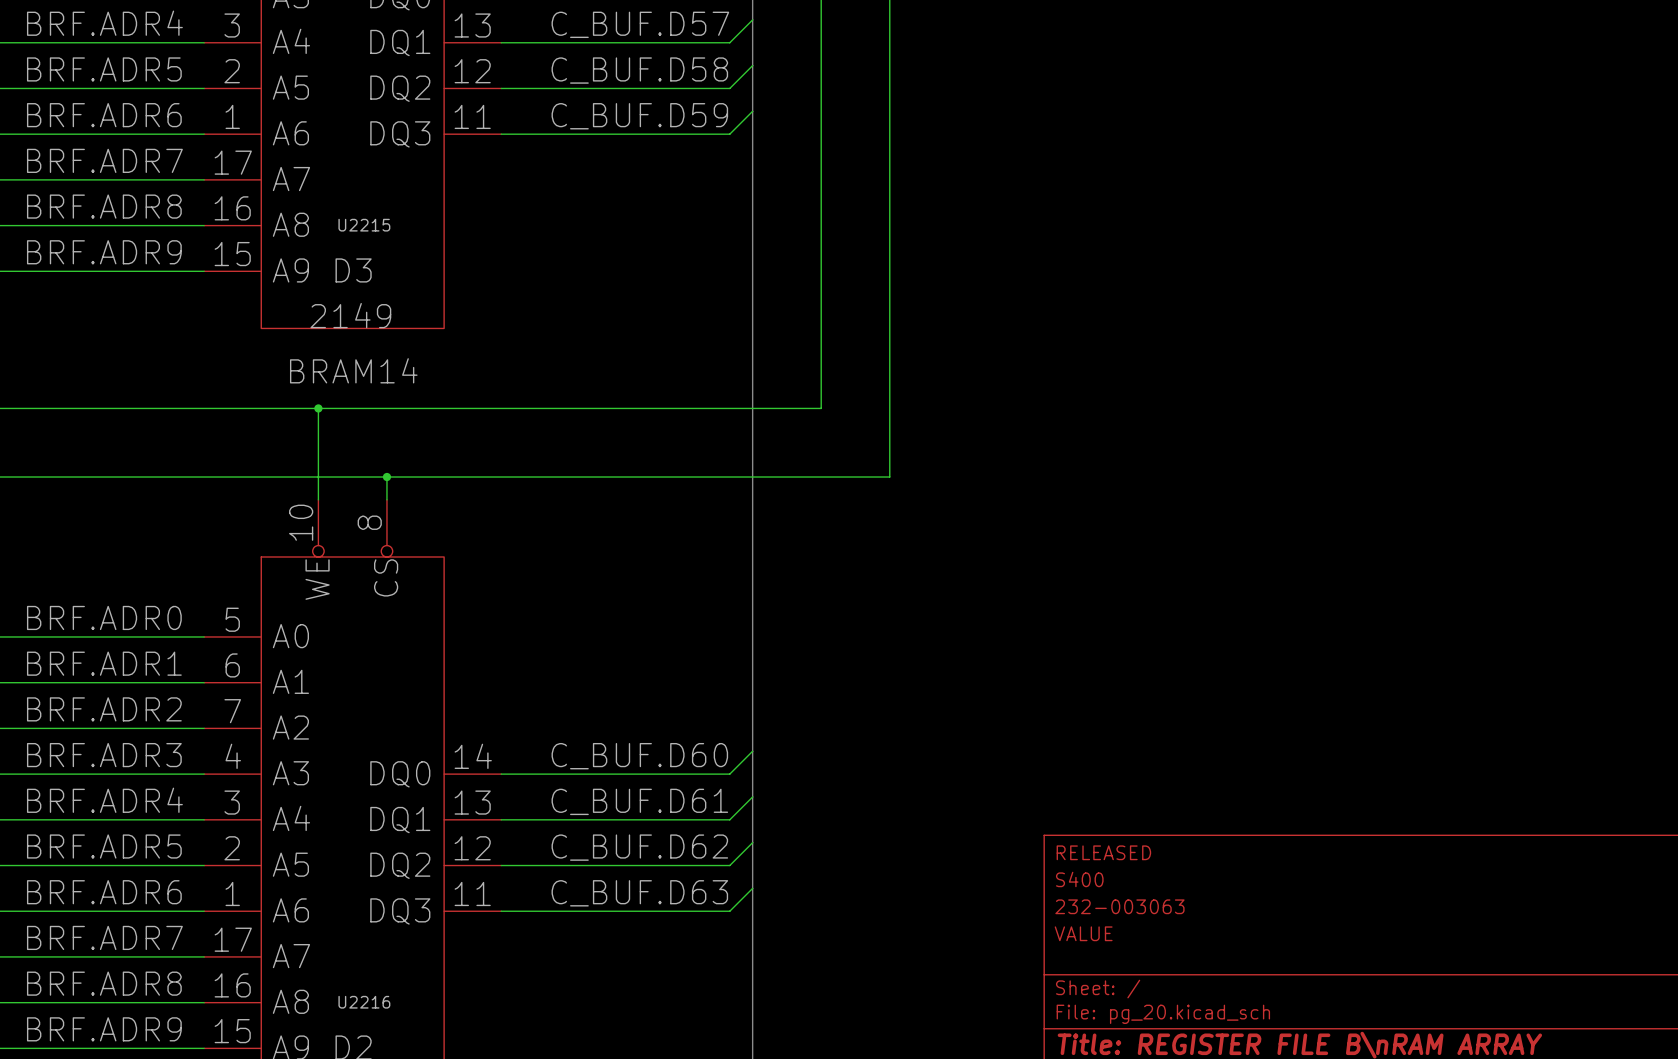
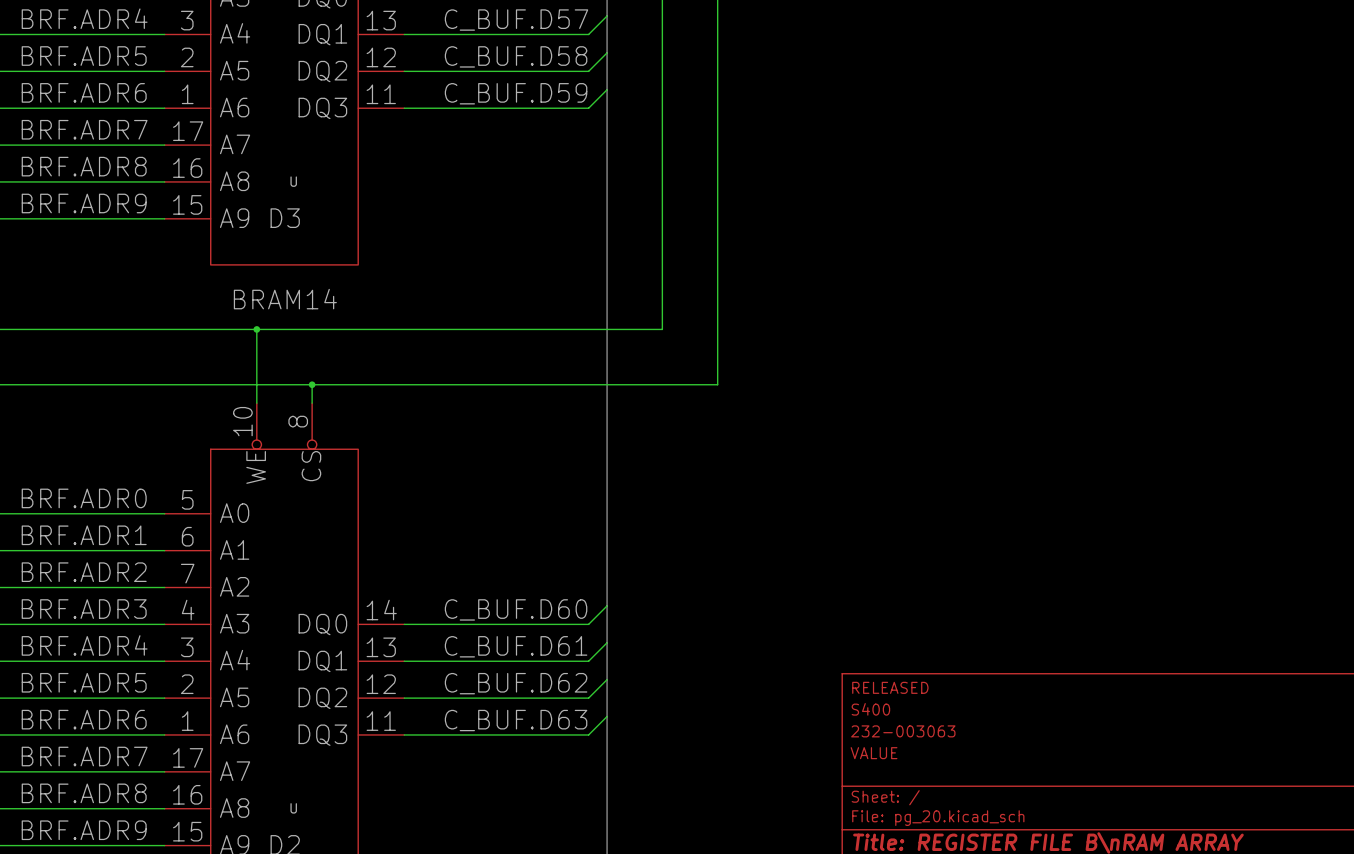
U2215 name: U2215 (364, 225) -> U (293, 181)
U2215 value: 2149 (350, 315) -> none
U2216 name: U2216 (364, 1002) -> U (293, 808)

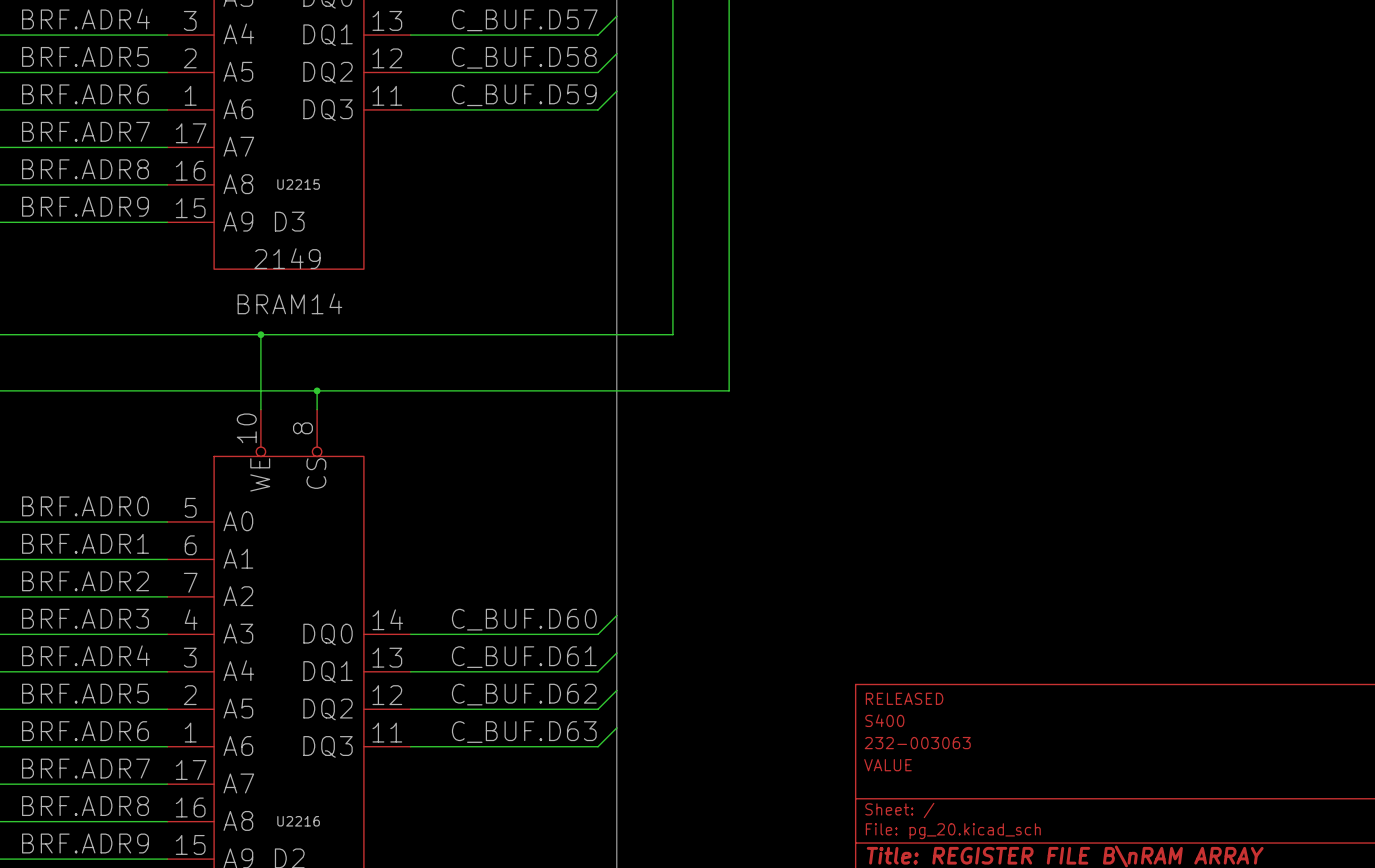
U name: U (293, 181) -> U2215 (298, 184)
U value: none -> 2149 (287, 258)
U name: U (293, 808) -> U2216 (298, 821)

